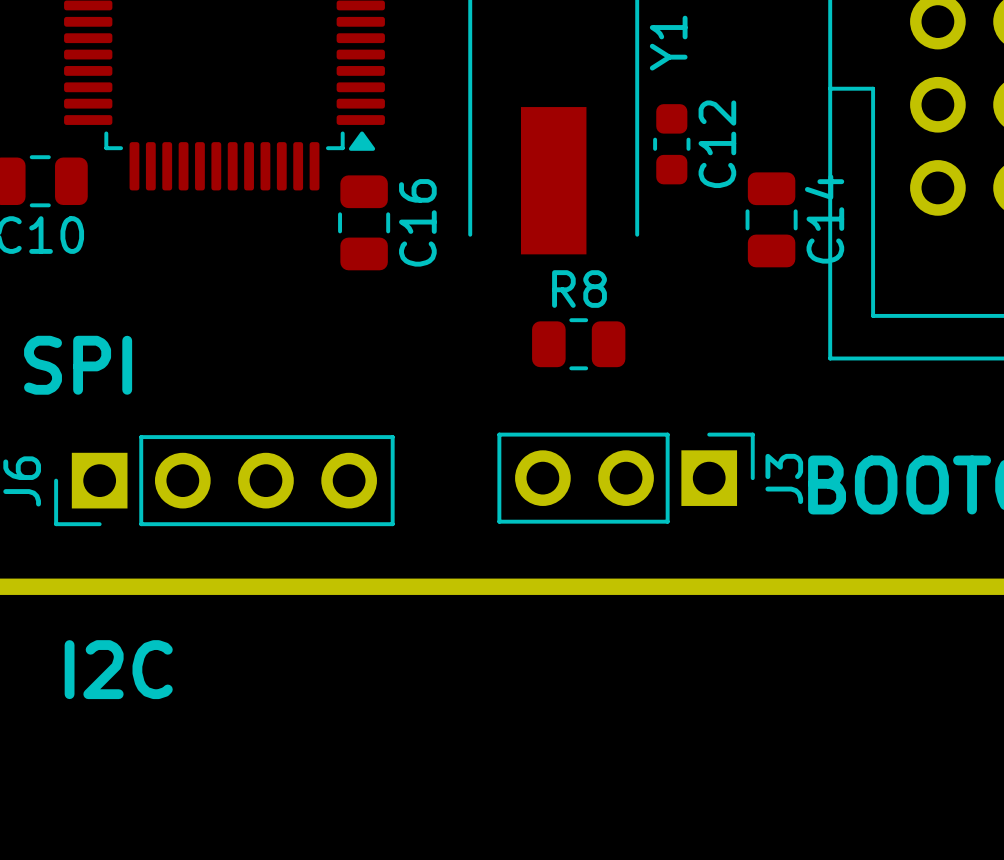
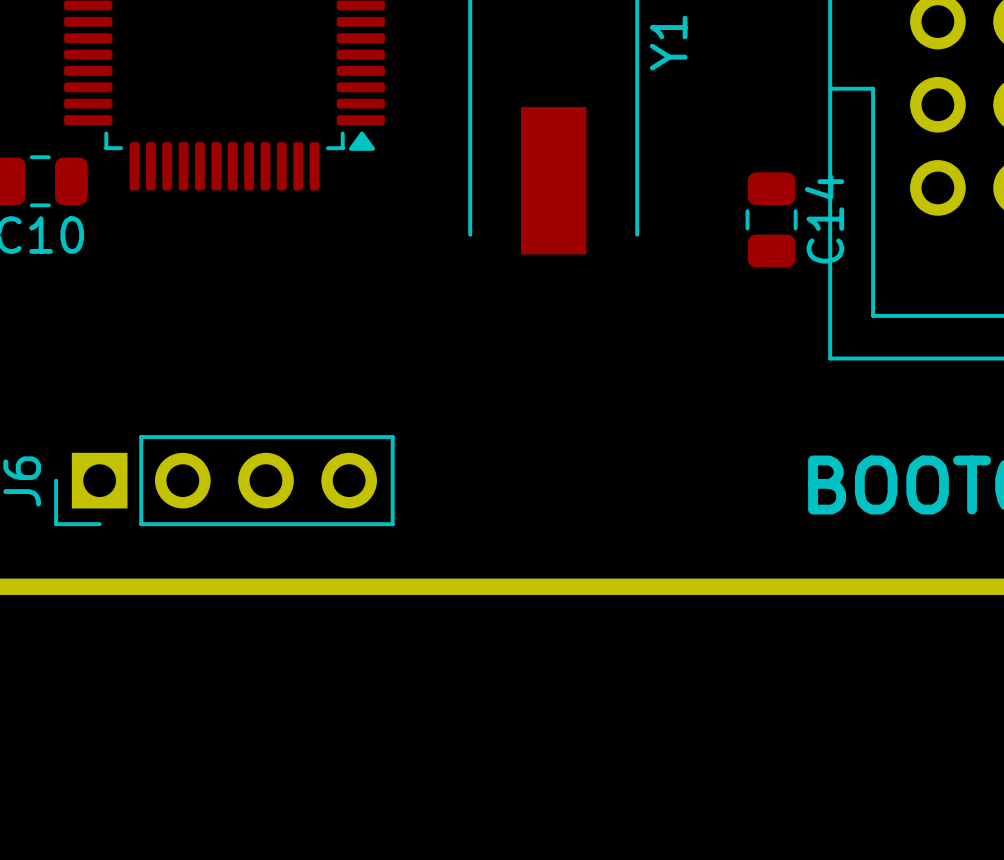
C12: (671, 144) -> none
C16: (364, 222) -> none
R8: (578, 344) -> none
text: SPI (78, 365) -> none
J3: (626, 478) -> none
text: I2C (118, 669) -> none

